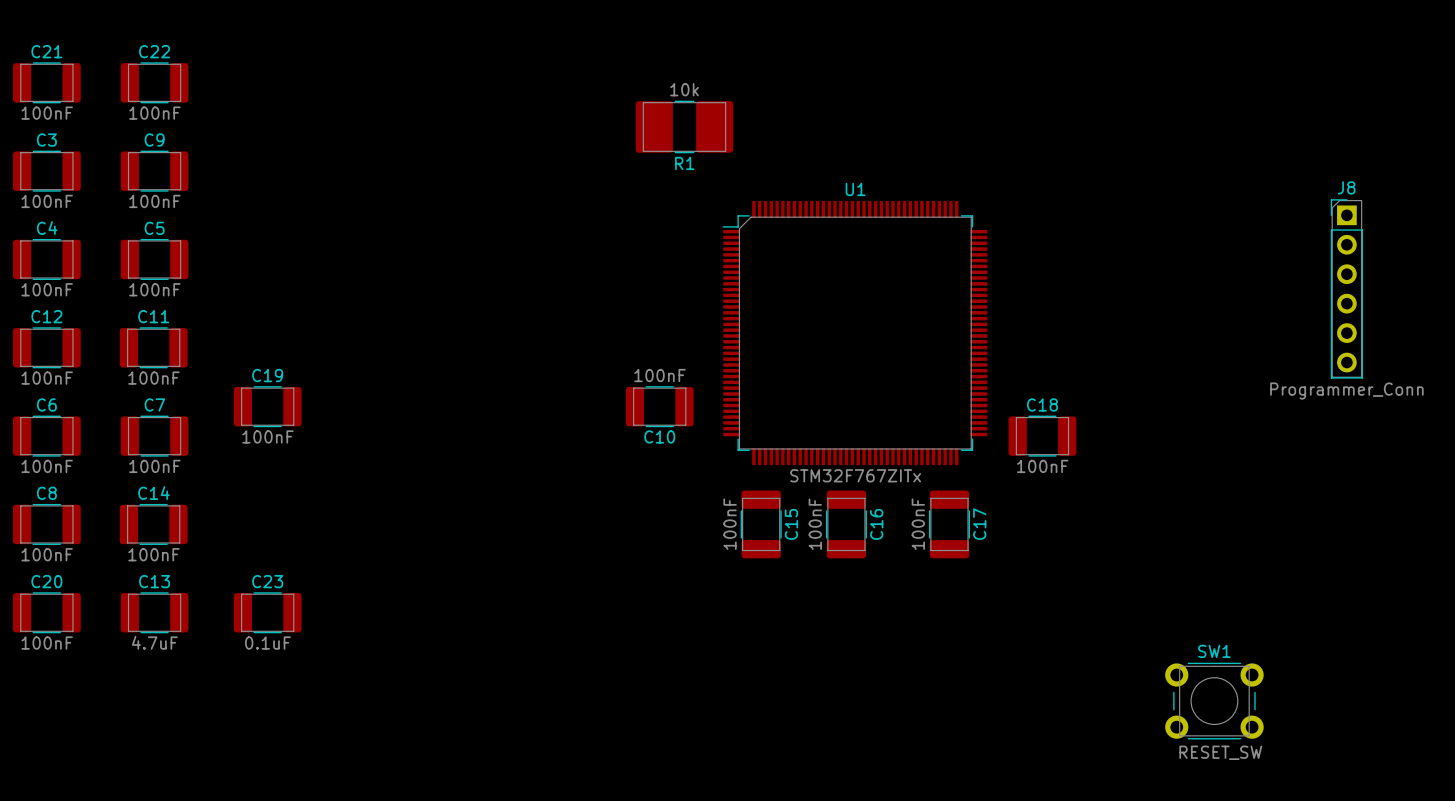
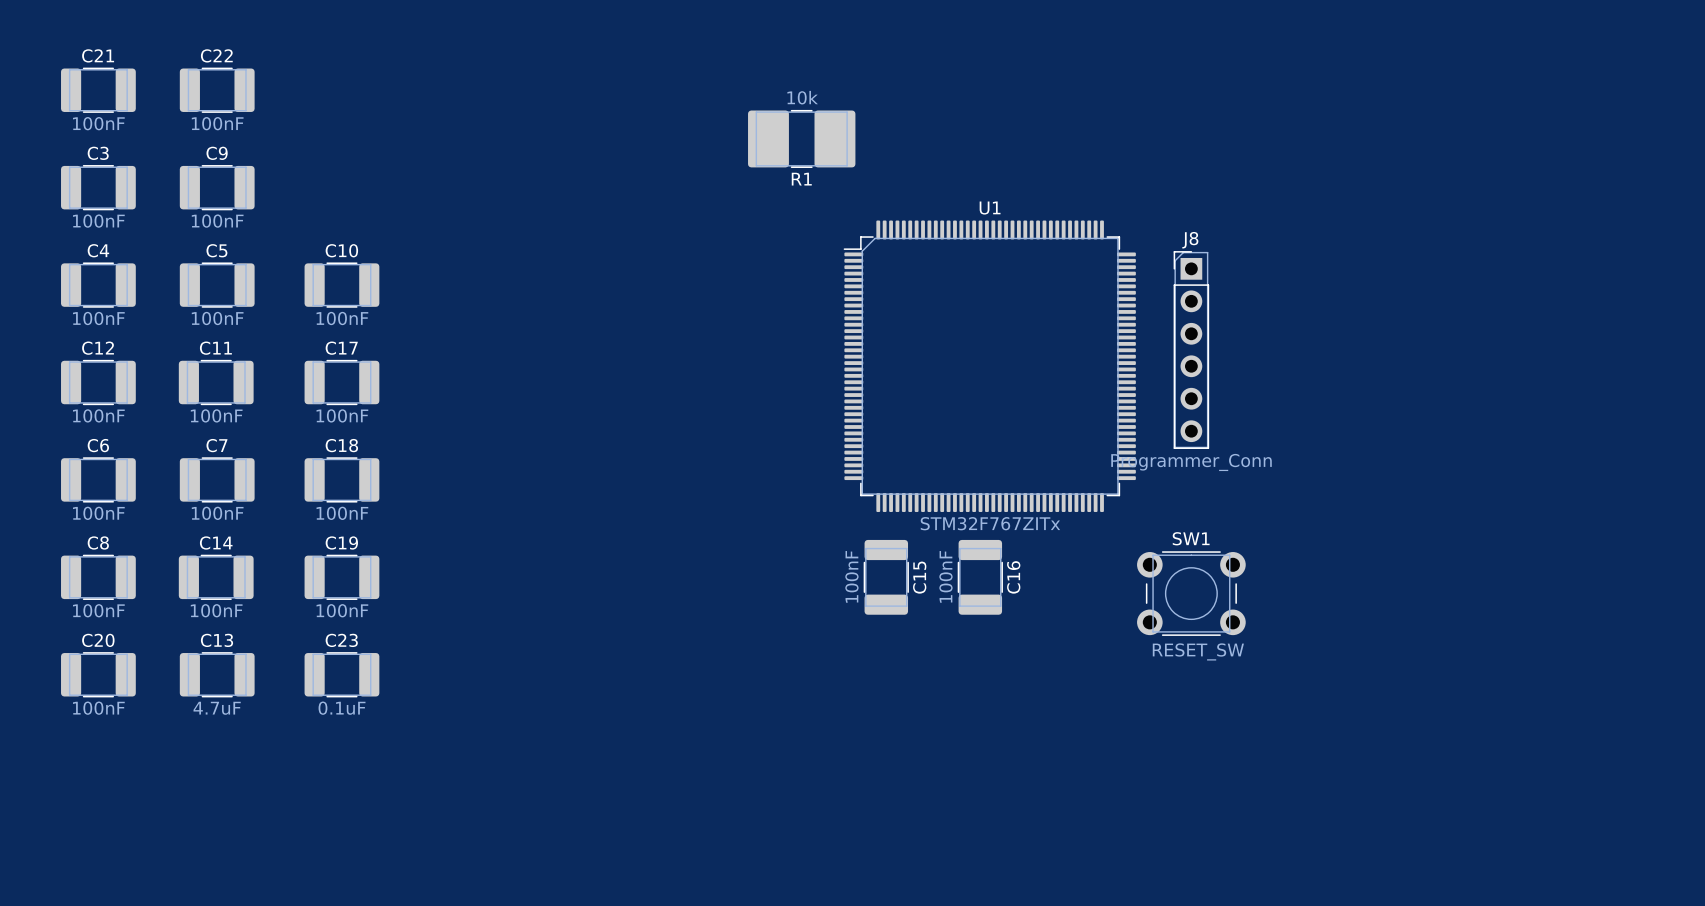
J8 position: (1346, 288) -> (1191, 350)
C10 value position: 100nF (660, 375) -> 100nF (342, 318)
C19 position: (267, 406) -> (341, 577)
C10 position: (659, 406) -> (341, 285)
C10 name position: C10 (659, 436) -> C10 (341, 250)
C18 position: (1042, 436) -> (341, 479)
C17 value position: 100nF (918, 524) -> 100nF (342, 415)
C17 rotation: 0° (949, 524) -> 90° clockwise (341, 382)
C17 position: (949, 524) -> (341, 382)
C17 name position: C17 (979, 524) -> C17 (341, 348)
SW1 position: (1214, 701) -> (1191, 593)

